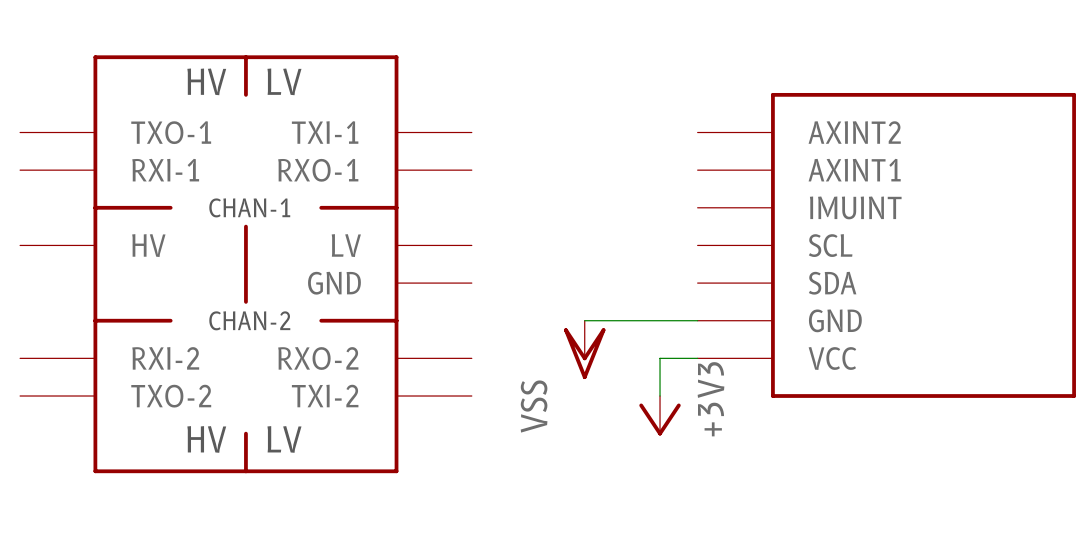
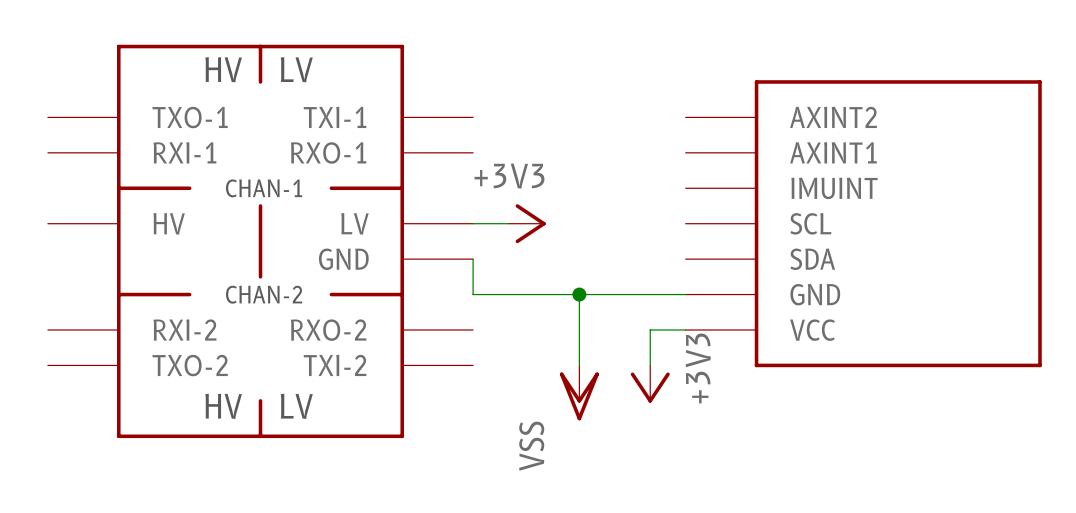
wire: none -> (473, 223) (508, 223)
power symbol: none -> +3V3 (527, 223)
wire: none -> (473, 259) (473, 294) (579, 294) (579, 365)
junction: none -> (579, 294)
power symbol position: VSS (584, 349) -> VSS (579, 392)

